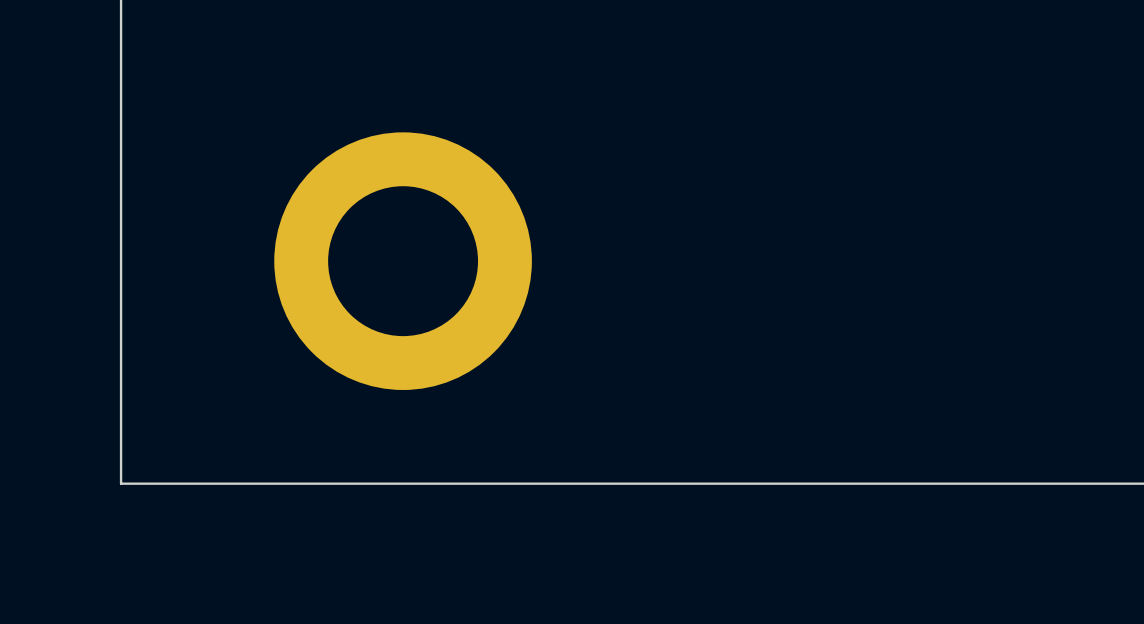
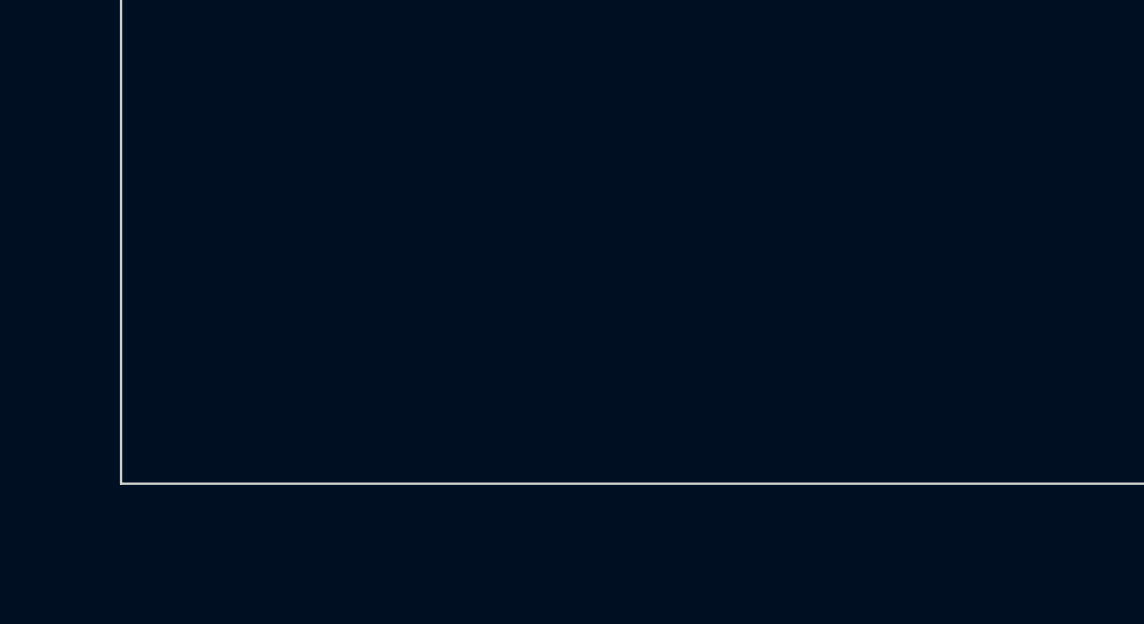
part: (403, 261) -> none

